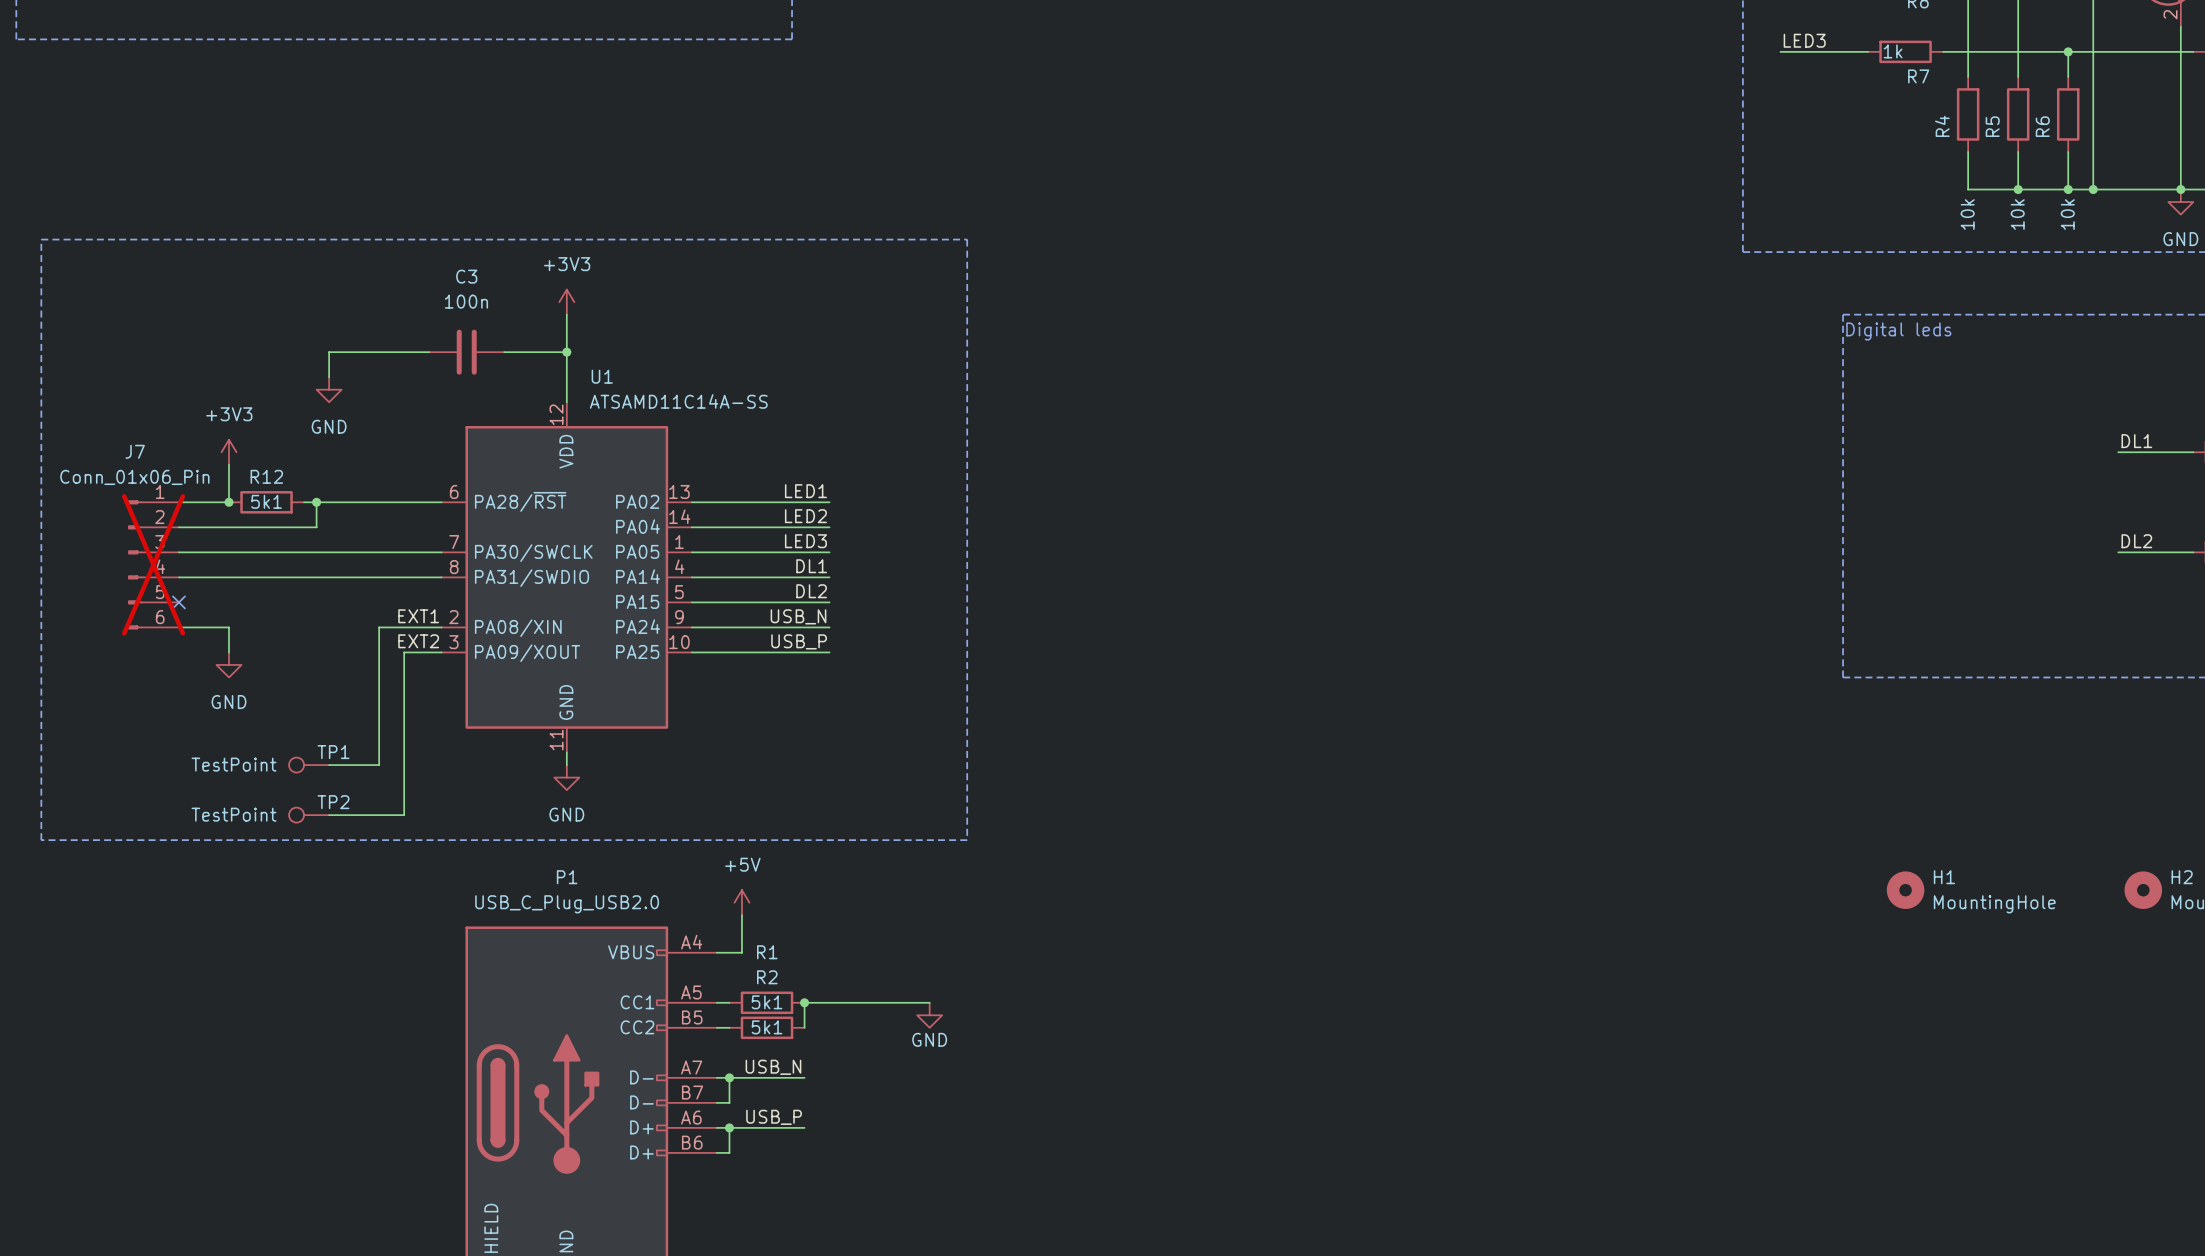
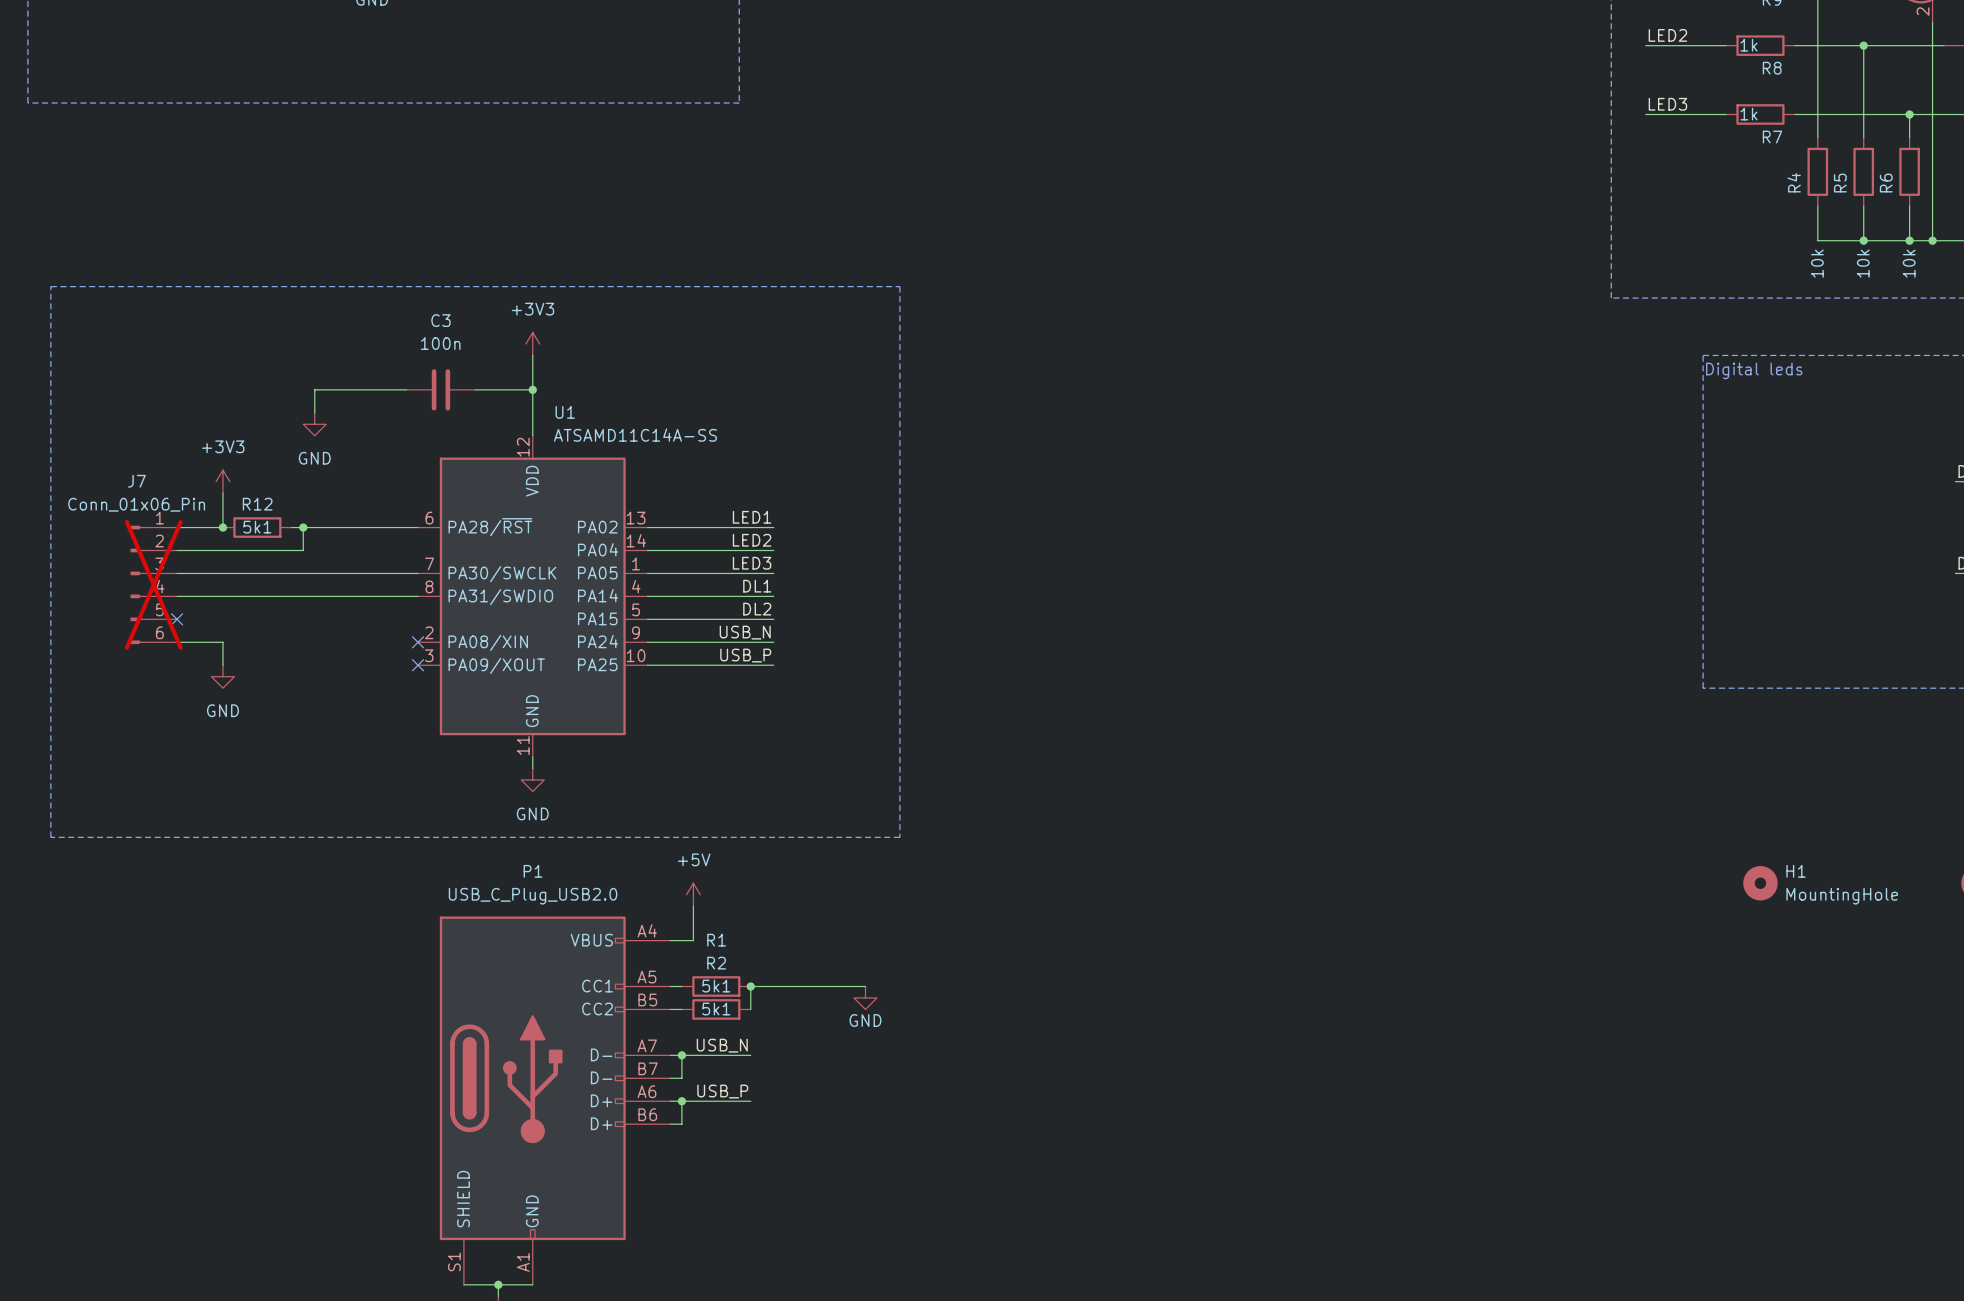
label: EXT1 (418, 616) -> none
wire: (441, 627) (379, 627) (379, 765) (329, 765) -> none
no-connect mark: none -> (418, 642)
label: EXT2 (418, 641) -> none
wire: (441, 652) (404, 652) (404, 815) (329, 815) -> none
no-connect mark: none -> (418, 665)
TP1: TestPoint (309, 765) -> none
TP2: TestPoint (309, 815) -> none

